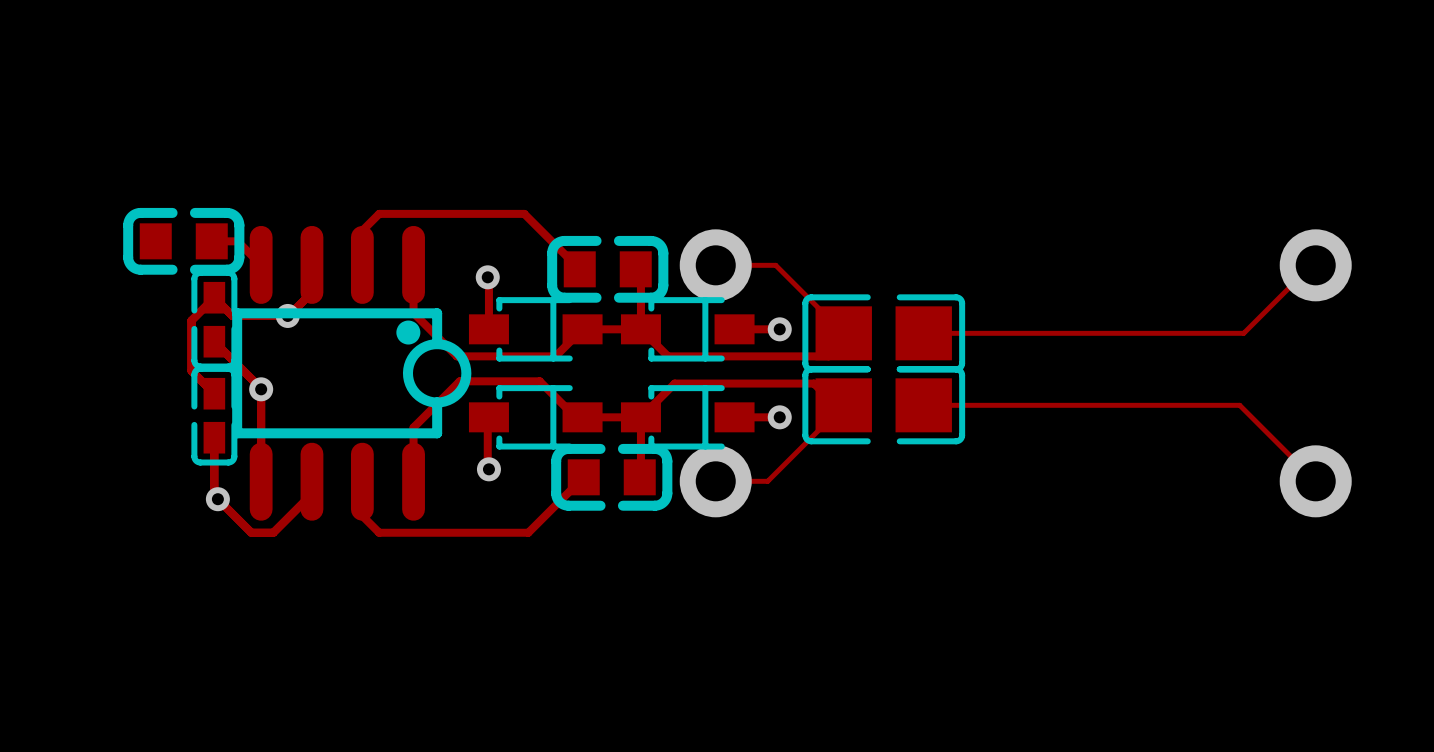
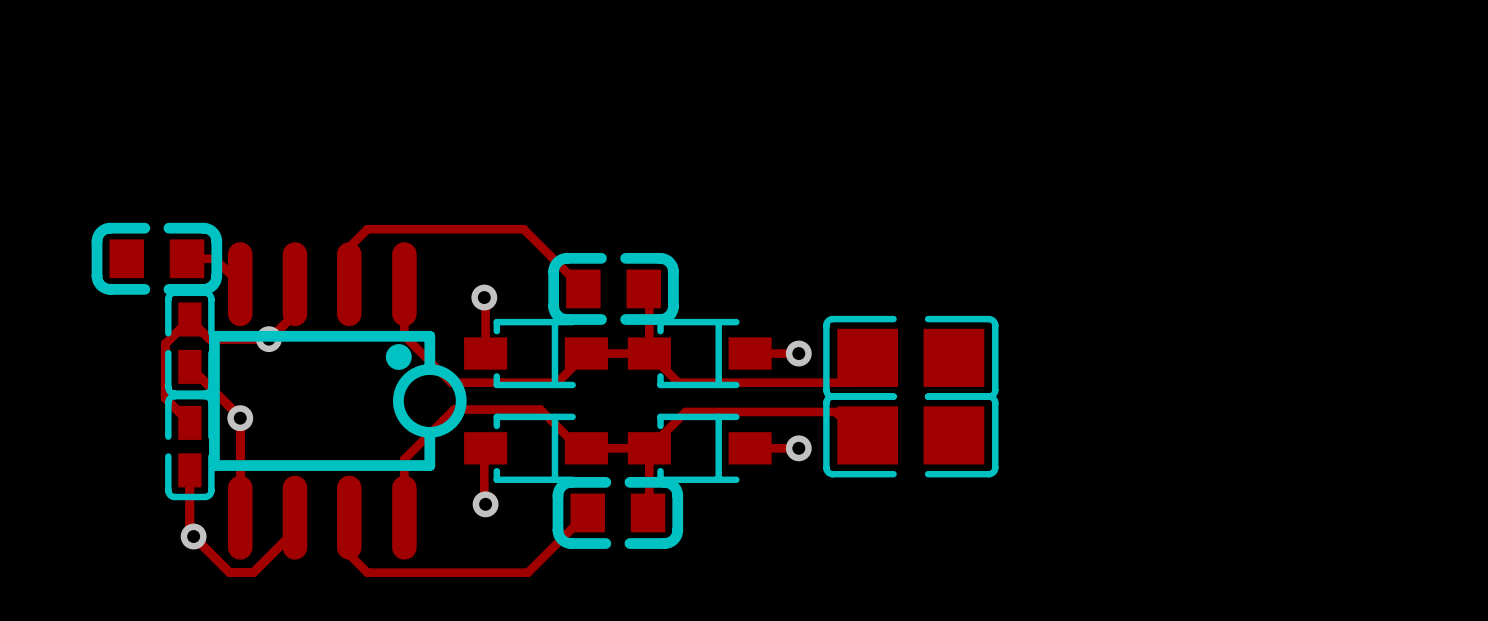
track: (715, 265) (775, 265) (843, 333) -> none
via: (715, 265) -> none
track: (1315, 265) (1311, 265) (1243, 333) (923, 333) -> none
via: (1315, 265) -> none
track: (843, 405) (767, 481) (715, 481) -> none
track: (923, 405) (1239, 405) (1315, 481) -> none
via: (715, 481) -> none
via: (1315, 481) -> none

